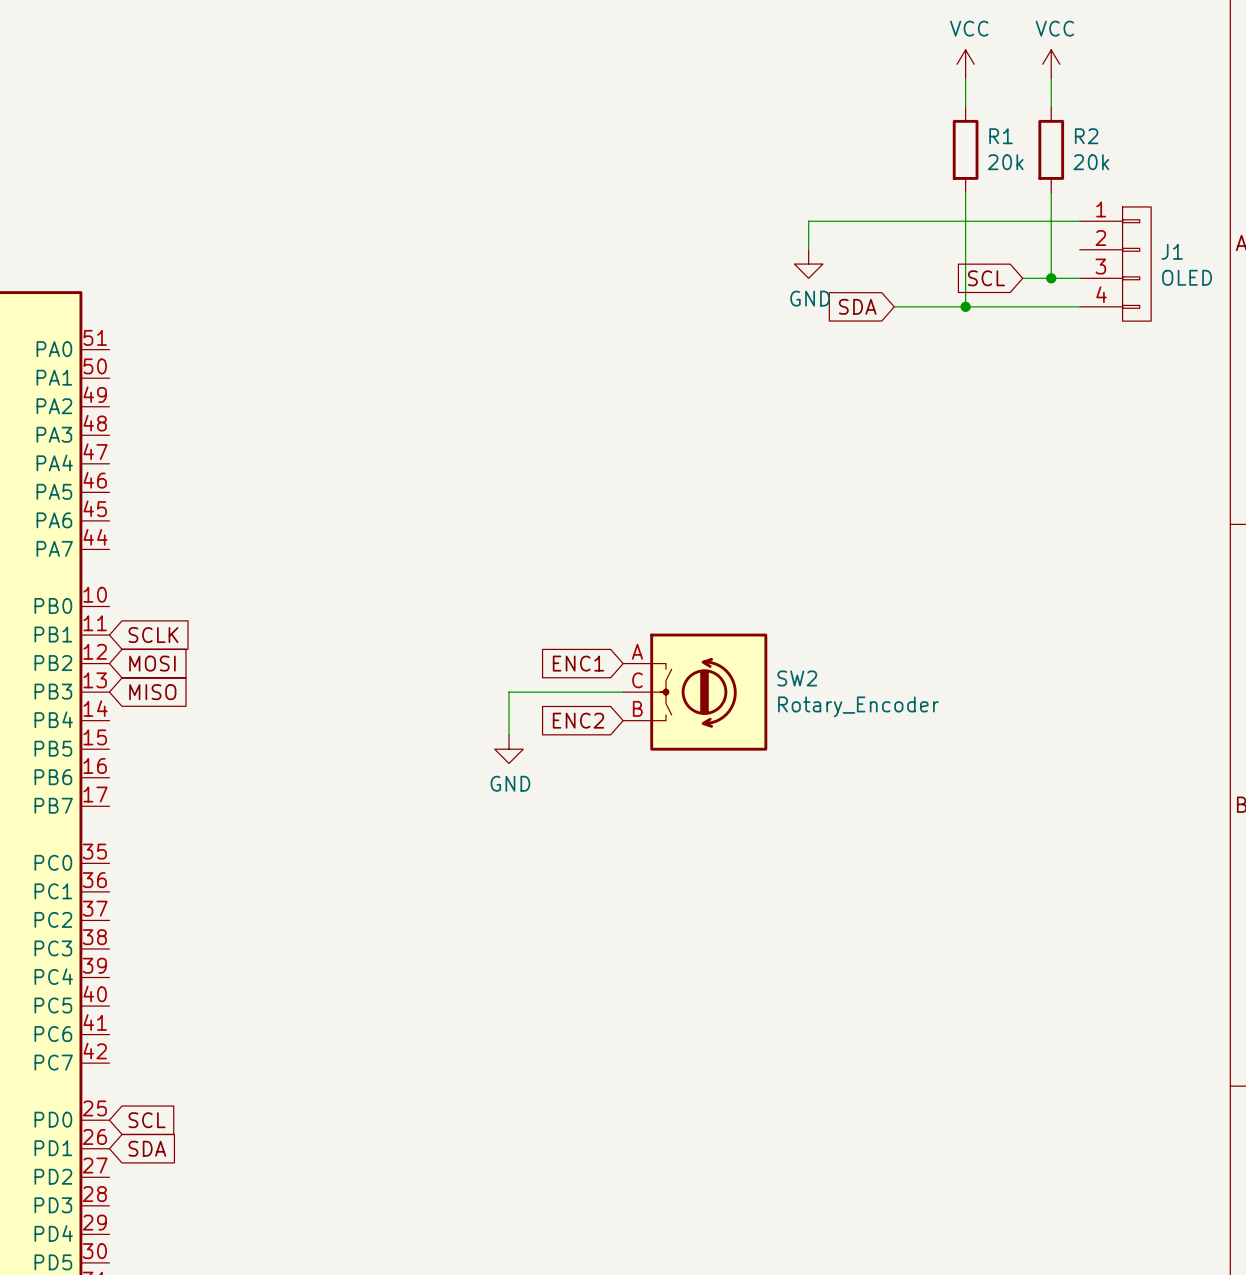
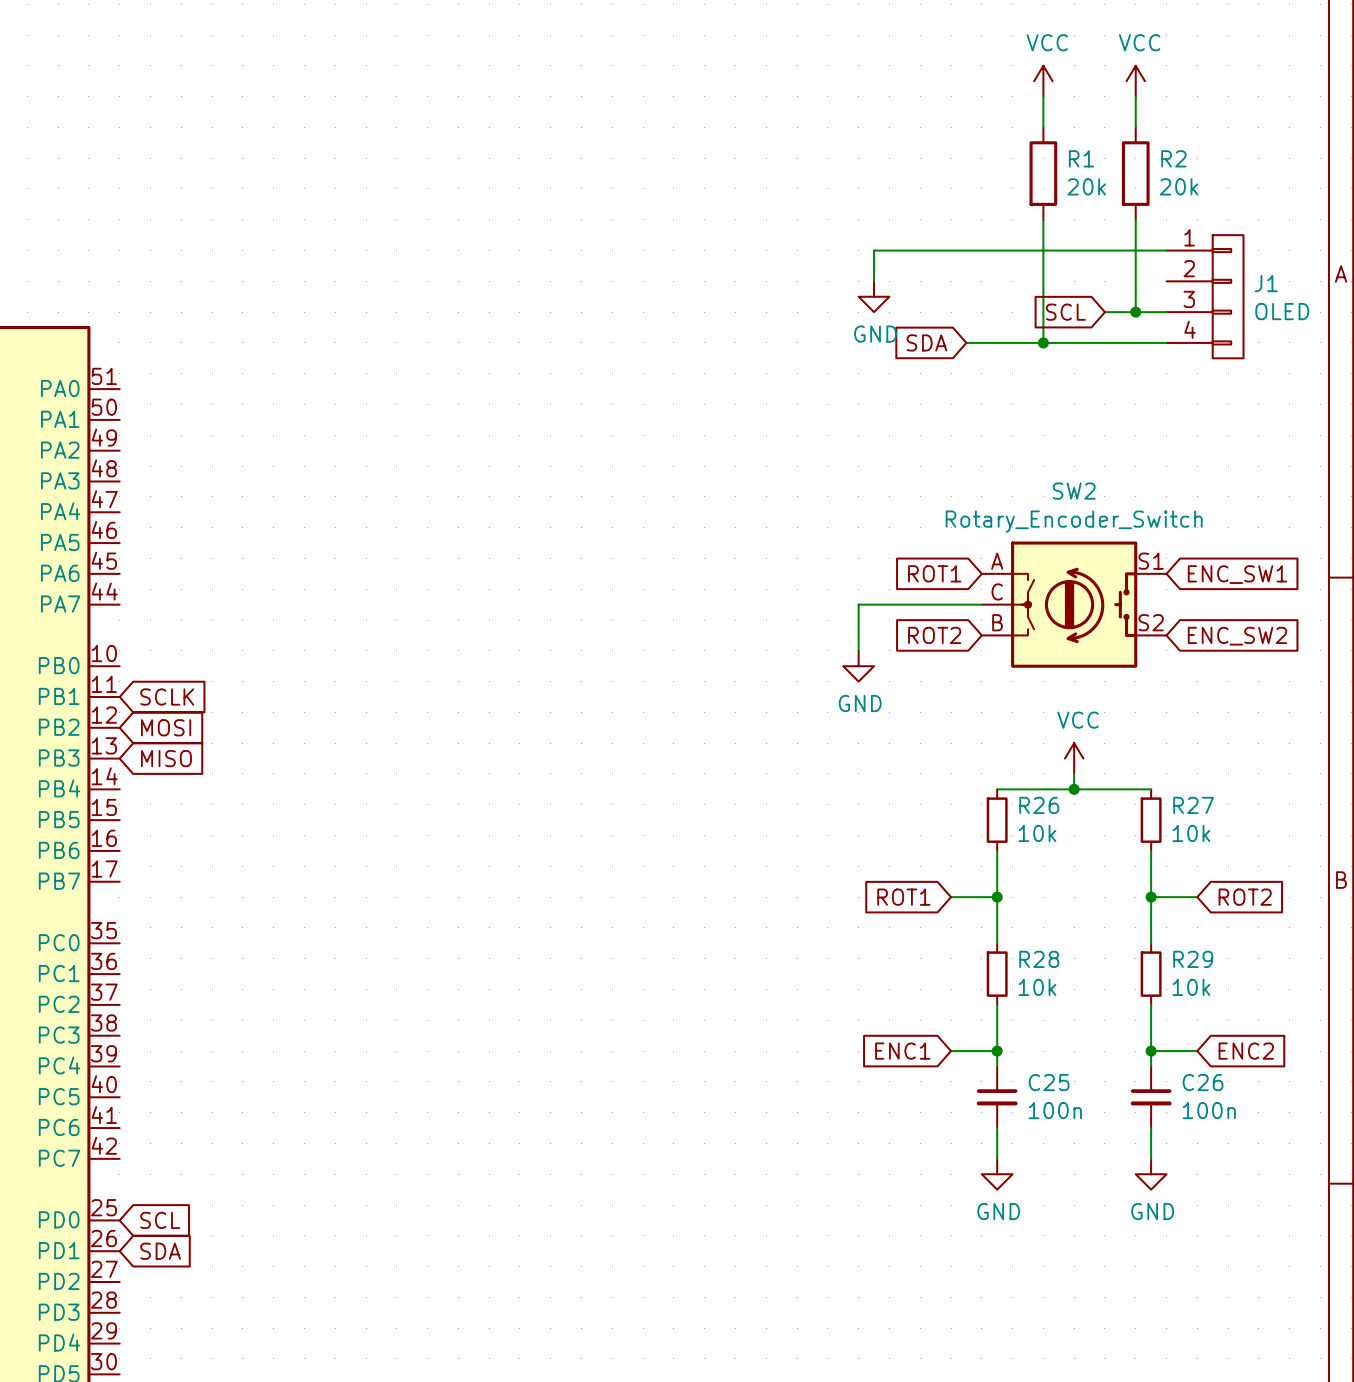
global label: none -> ROT1 (934, 573)
global label: none -> ENC_SW1 (1237, 574)
wire: none -> (981, 604) (858, 604) (858, 650)
global label: none -> ROT2 (934, 635)
global label: none -> ENC_SW2 (1237, 636)
power symbol: none -> GND (858, 666)
SW2 symbol: [623, 633, 768, 751] -> [981, 541, 1167, 668]
global label: ENC1 (578, 663) -> none
SW2 name position: SW2 (797, 678) -> SW2 (1074, 491)
wire: (623, 692) (509, 692) (509, 734) -> none
power symbol: none -> VCC (1074, 758)
SW2 value: Rotary_Encoder (858, 706) -> Rotary_Encoder_Switch (1074, 521)
wire: none -> (1074, 773) (1074, 789)
global label: ENC2 (578, 720) -> none
wire: none -> (997, 789) (1151, 789)
junction: none -> (1074, 789)
power symbol: GND (509, 749) -> none
R26: none -> 10k (997, 820)
R27: none -> 10k (1151, 820)
wire: none -> (997, 850) (997, 943)
wire: none -> (1151, 850) (1151, 943)
global label: none -> ROT1 (903, 897)
wire: none -> (951, 897) (997, 897)
junction: none -> (997, 897)
wire: none -> (1151, 897) (1197, 897)
junction: none -> (1151, 897)
global label: none -> ROT2 (1245, 897)
R28: none -> 10k (997, 974)
R29: none -> 10k (1151, 974)
wire: none -> (997, 1004) (997, 1066)
wire: none -> (1151, 1004) (1151, 1066)
global label: none -> ENC1 (902, 1051)
wire: none -> (951, 1051) (997, 1051)
junction: none -> (997, 1051)
wire: none -> (1151, 1051) (1197, 1051)
junction: none -> (1151, 1051)
global label: none -> ENC2 (1246, 1051)
C25: none -> 100n (997, 1097)
C26: none -> 100n (1151, 1097)
wire: none -> (997, 1128) (997, 1158)
wire: none -> (1151, 1128) (1151, 1158)
power symbol: none -> GND (997, 1174)
power symbol: none -> GND (1151, 1174)

